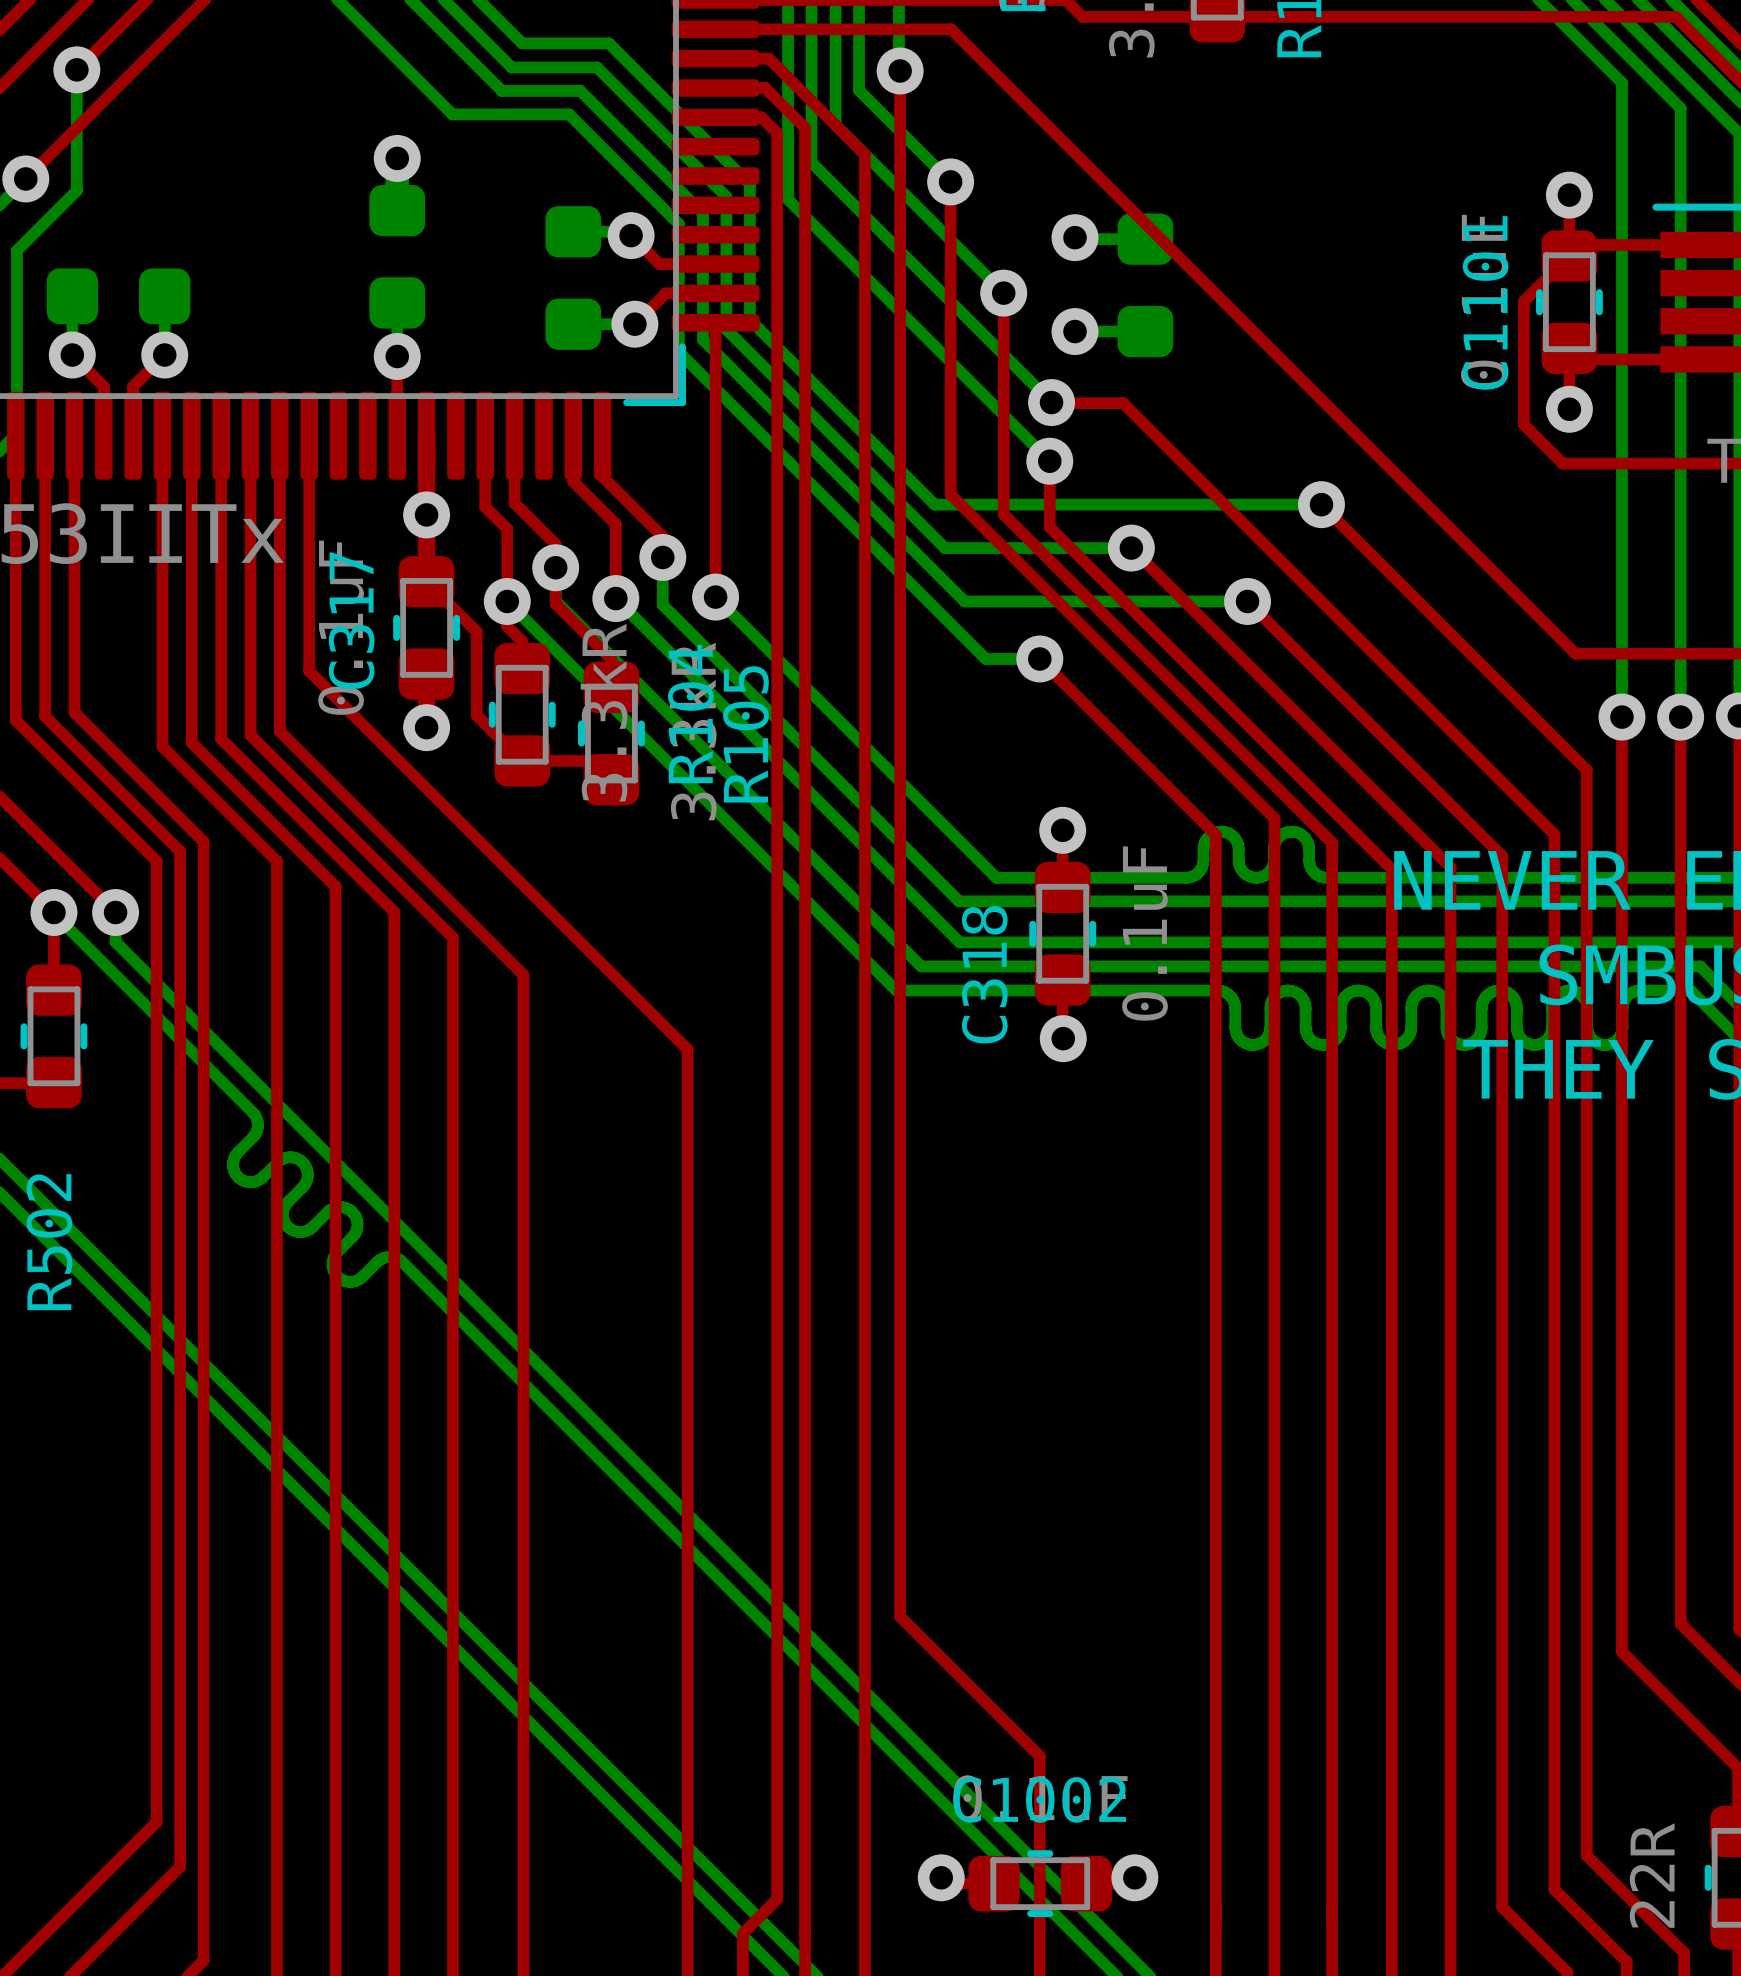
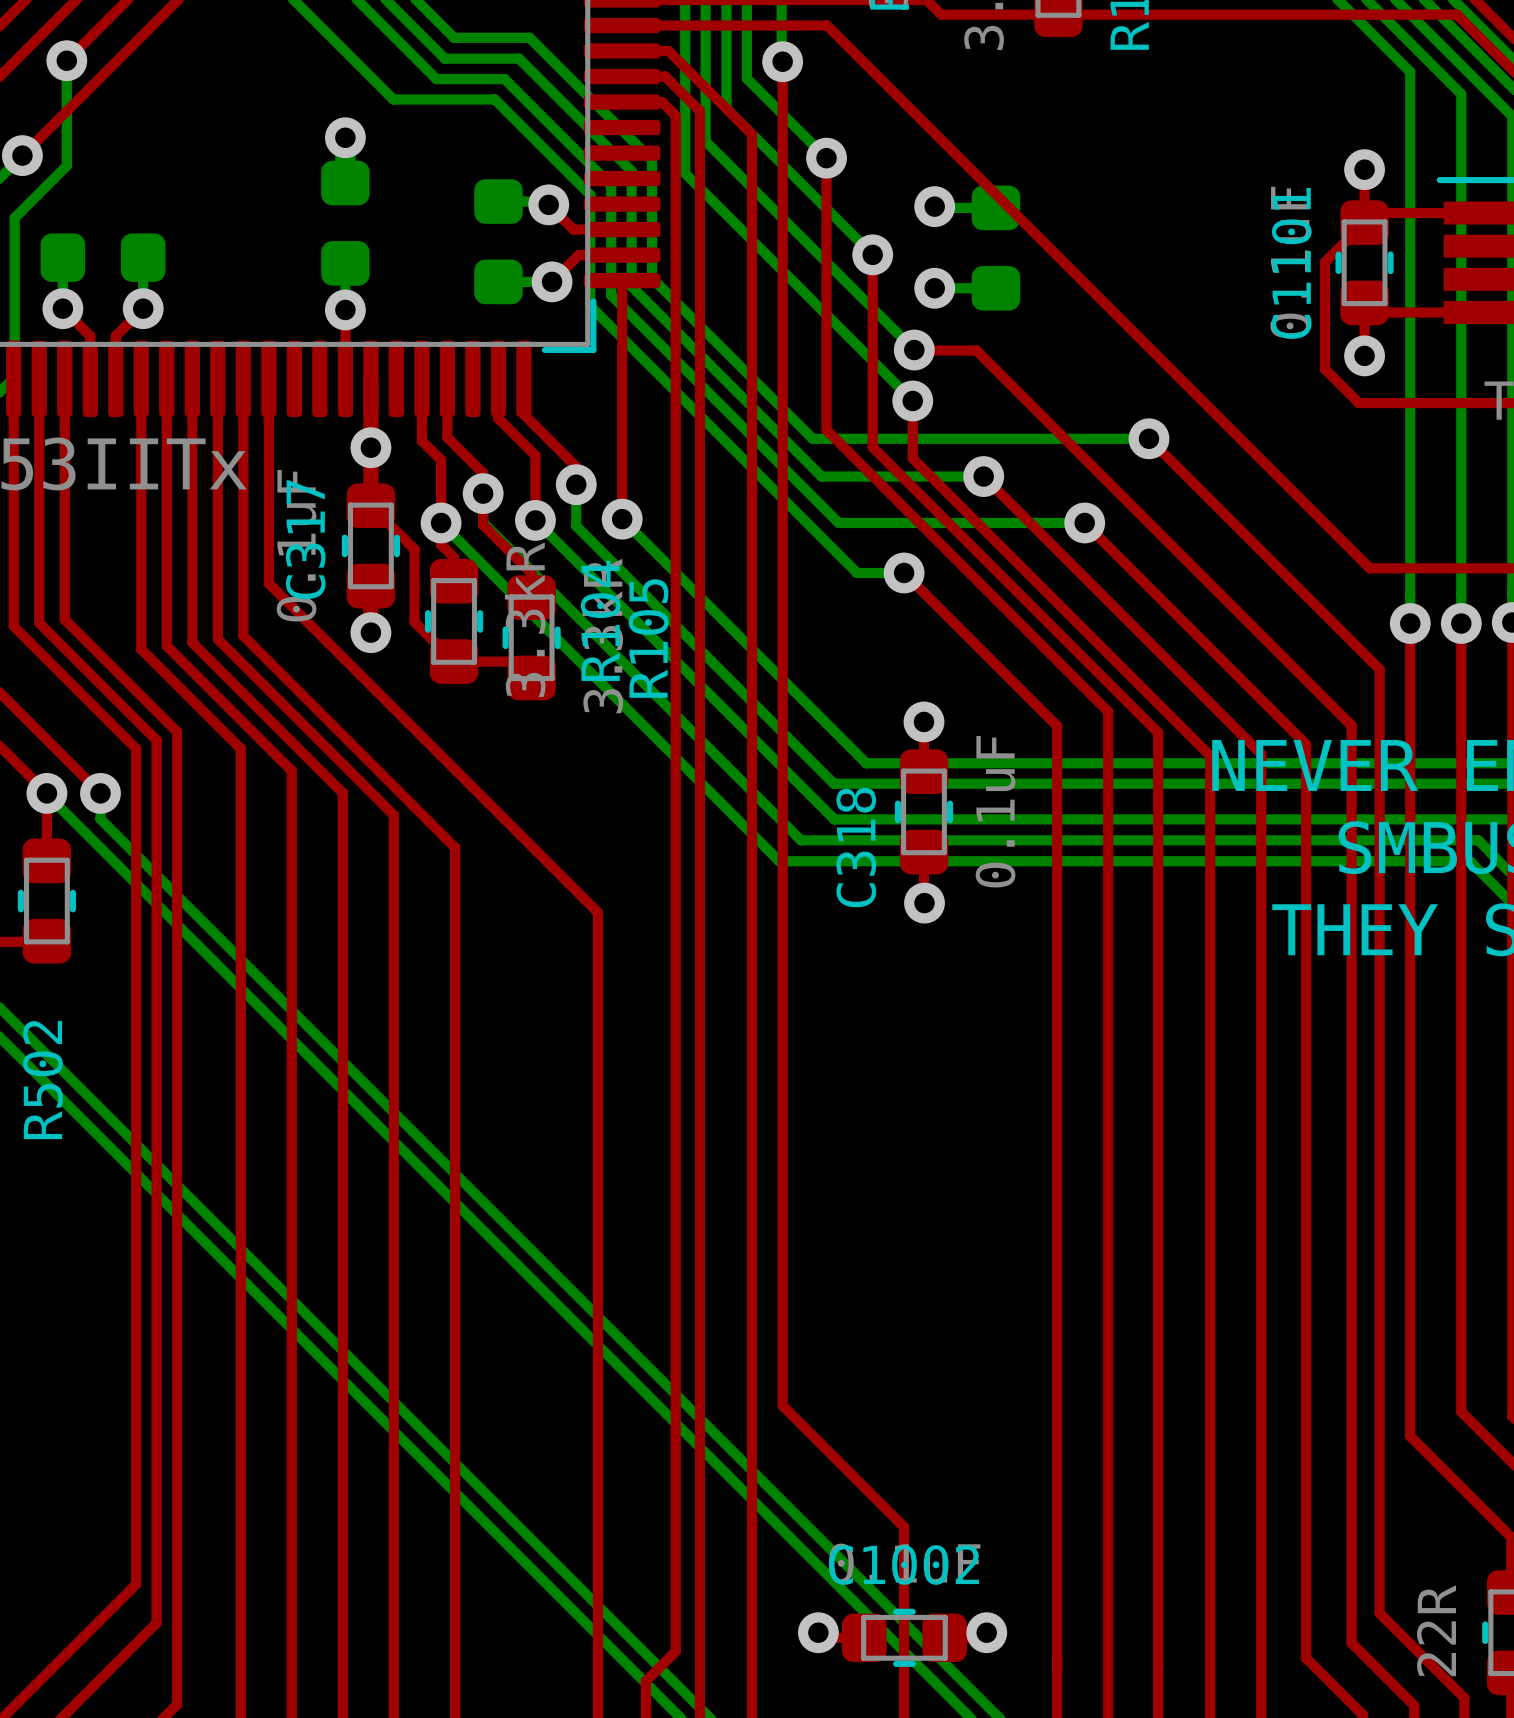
bottom track: (1185, 877) (1193, 876) (1201, 867) (1203, 845) (1207, 838) (1213, 833) (1221, 831) (1228, 833) (1236, 841) (1239, 864) (1242, 871) (1248, 876) (1260, 877) (1270, 871) (1273, 864) (1275, 841) (1283, 833) (1291, 831) (1299, 833) (1307, 841) (1309, 864) (1313, 871) (1319, 876) (1326, 877) -> (1031, 763) (1153, 763)
bottom track: (1217, 990) (1225, 992) (1233, 1000) (1235, 1031) (1239, 1038) (1245, 1043) (1252, 1044) (1260, 1043) (1268, 1034) (1272, 1000) (1277, 994) (1284, 990) (1291, 990) (1301, 997) (1305, 1004) (1307, 1034) (1315, 1043) (1323, 1044) (1330, 1043) (1339, 1034) (1342, 1000) (1347, 994) (1354, 990) (1362, 990) (1372, 997) (1375, 1004) (1377, 1034) (1386, 1043) (1393, 1044) (1401, 1043) (1409, 1034) (1413, 1000) (1417, 994) (1424, 990) (1432, 990) (1442, 997) (1446, 1004) (1448, 1034) (1456, 1043) (1464, 1044) (1471, 1043) (1479, 1034) (1482, 1004) (1485, 997) (1491, 992) (1503, 990) (1513, 997) (1516, 1004) (1518, 1034) (1526, 1043) (1534, 1044) (1542, 1043) (1550, 1034) (1552, 1004) (1555, 997) (1565, 990) (1573, 990) (1580, 994) (1585, 1000) (1589, 1034) (1597, 1043) (1604, 1044) (1612, 1043) (1620, 1034) (1622, 1004) (1626, 997) (1632, 992) (1640, 990) -> (1058, 861) (1426, 861)
bottom track: (252, 1112) (257, 1123) (257, 1130) (235, 1155) (233, 1162) (233, 1170) (241, 1179) (252, 1182) (259, 1179) (284, 1158) (296, 1158) (302, 1162) (307, 1172) (306, 1180) (283, 1208) (283, 1220) (287, 1226) (298, 1232) (306, 1231) (330, 1209) (338, 1207) (345, 1208) (354, 1215) (357, 1226) (354, 1233) (333, 1258) (333, 1270) (337, 1276) (348, 1281) (355, 1280) (384, 1257) (395, 1257) (402, 1261) -> (219, 967) (349, 1097)

